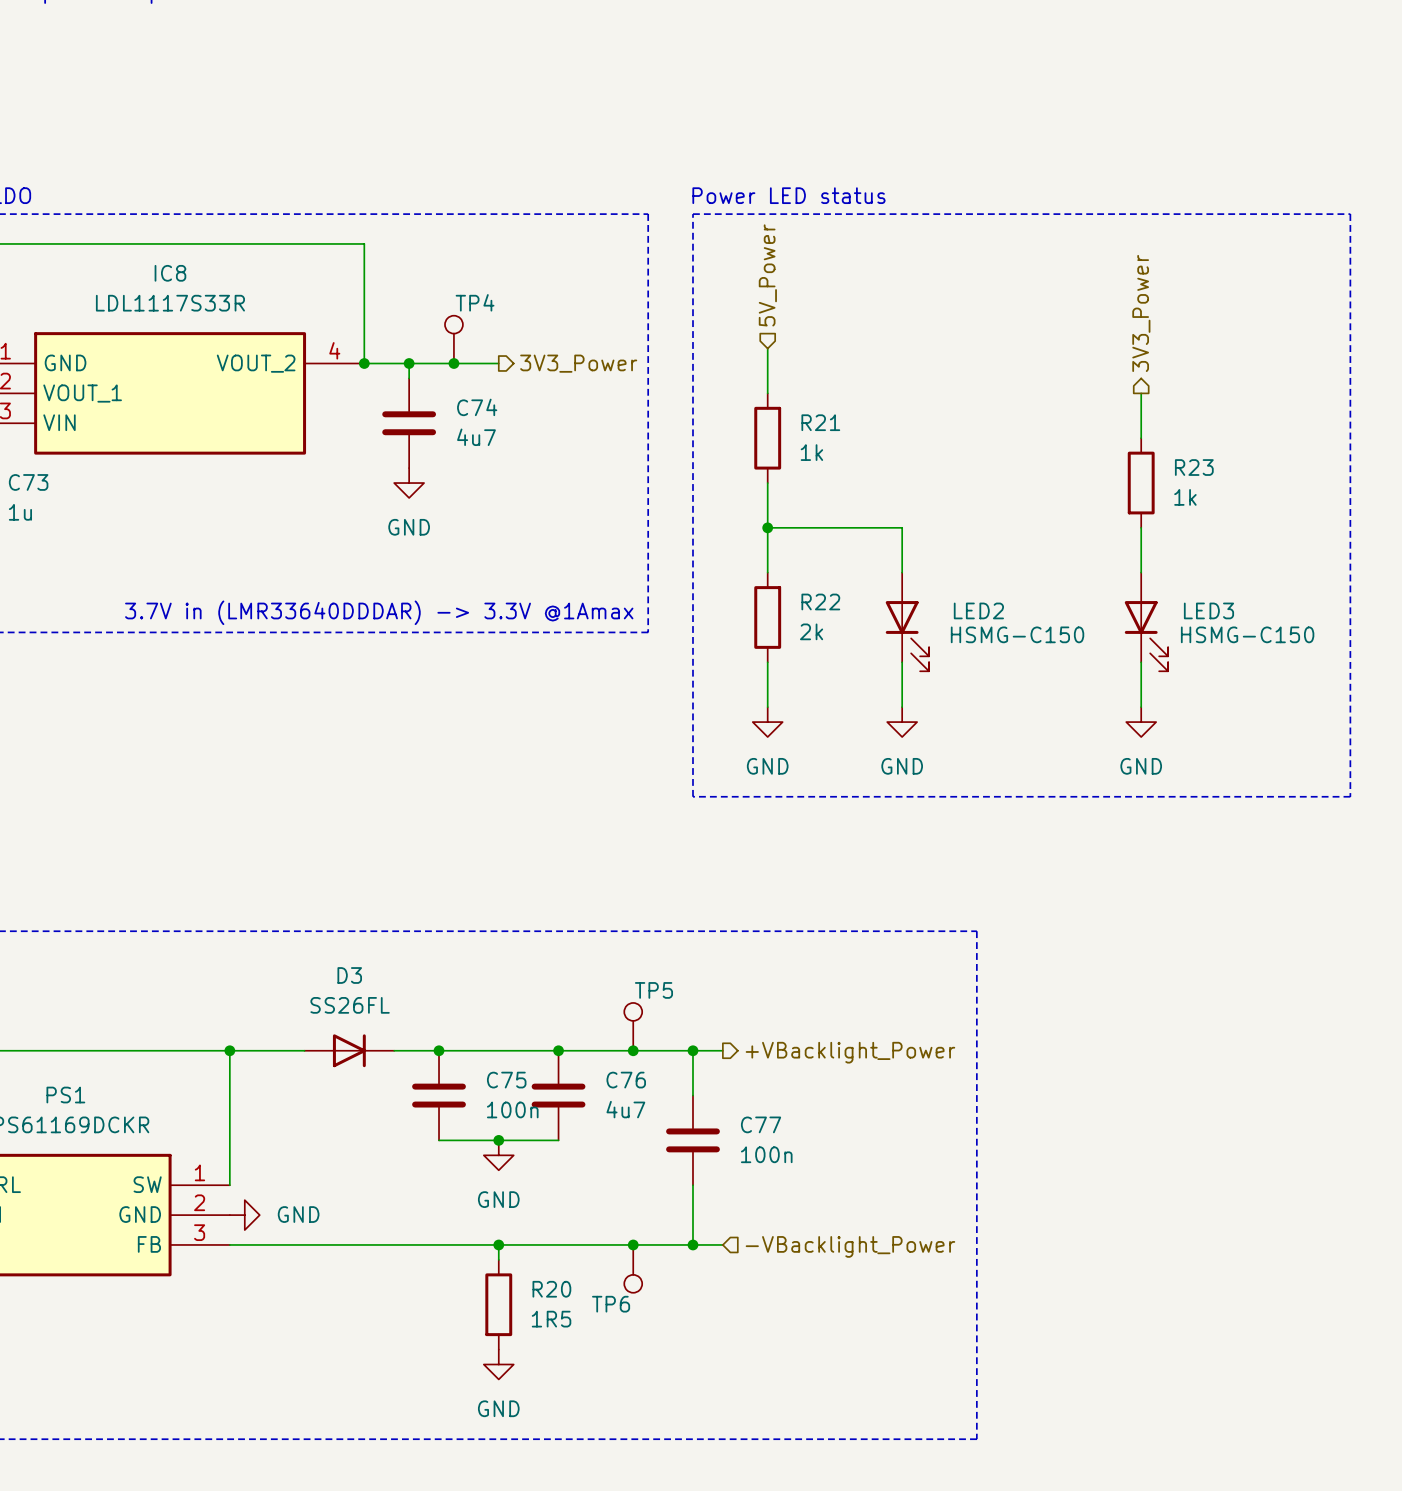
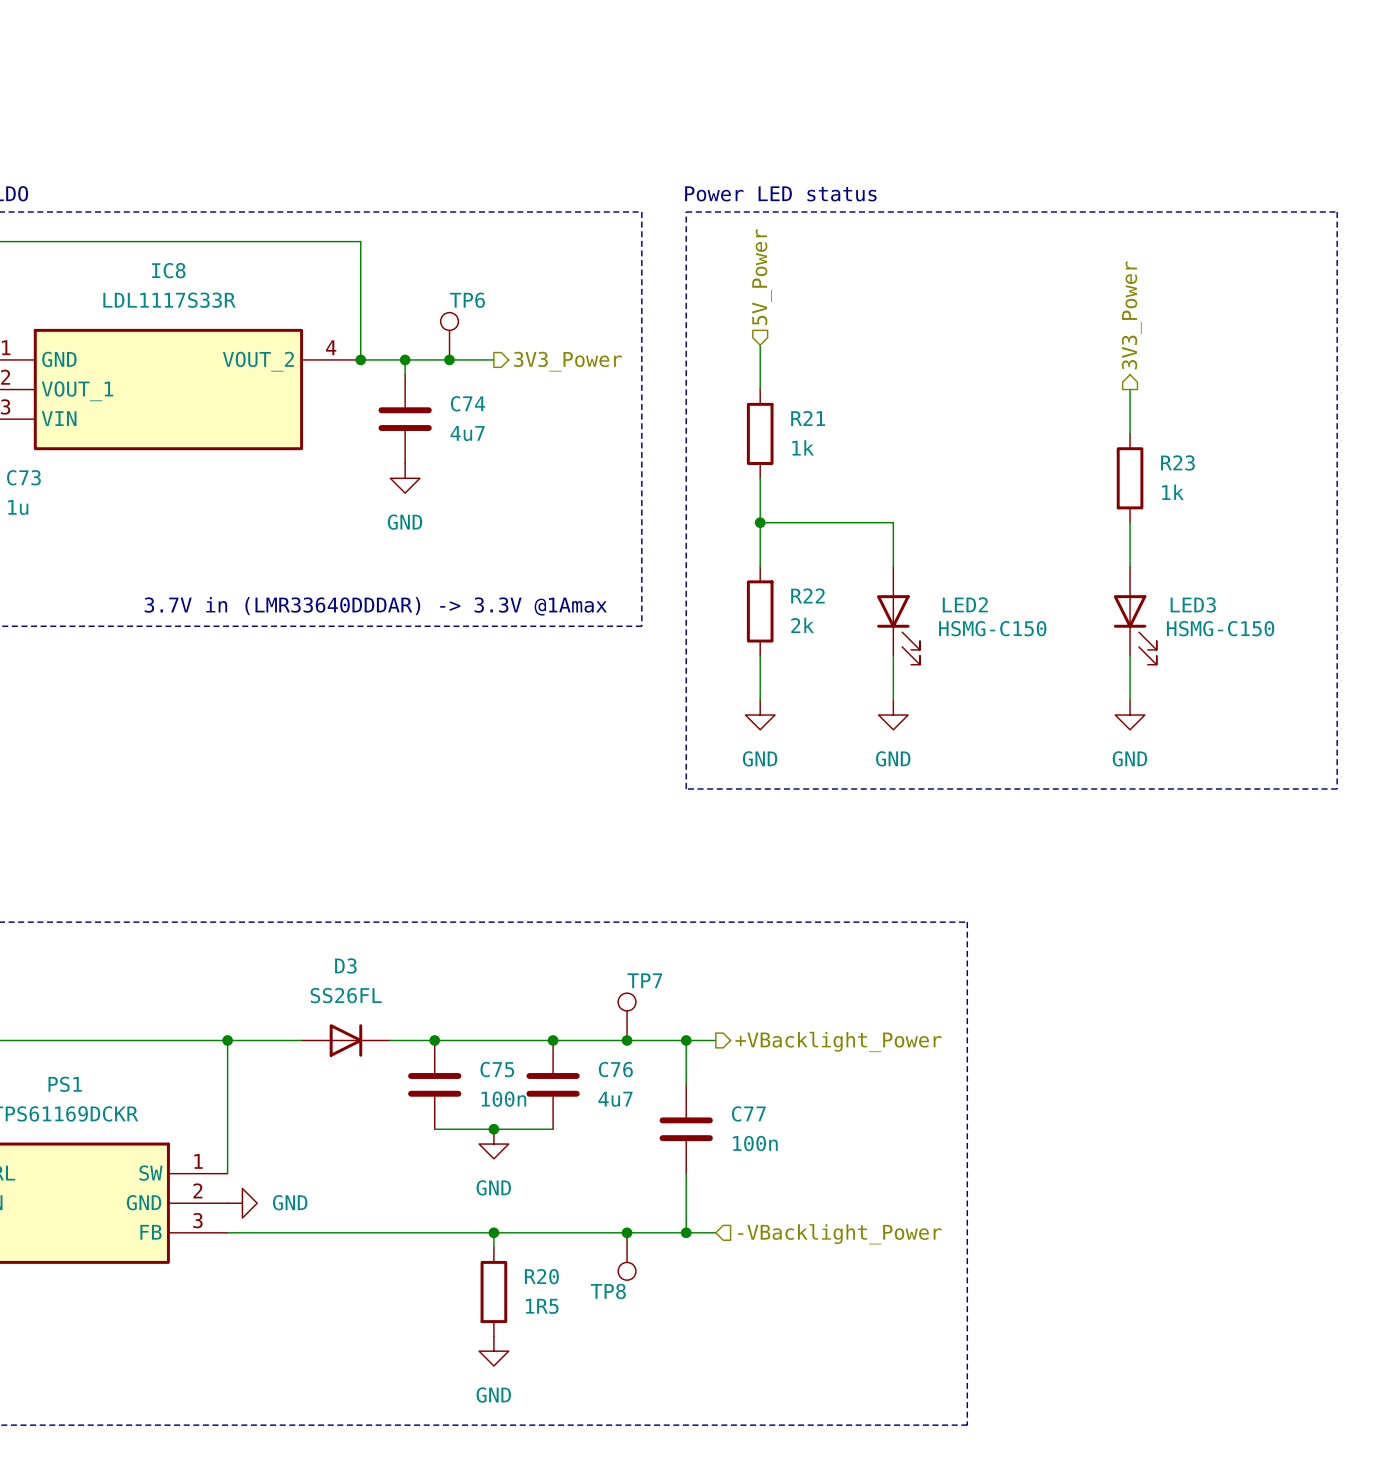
TP4 name: TP4 (475, 302) -> TP6 (467, 300)
TP5 name: TP5 (653, 990) -> TP7 (644, 980)
TP6 name: TP6 (611, 1304) -> TP8 (608, 1291)

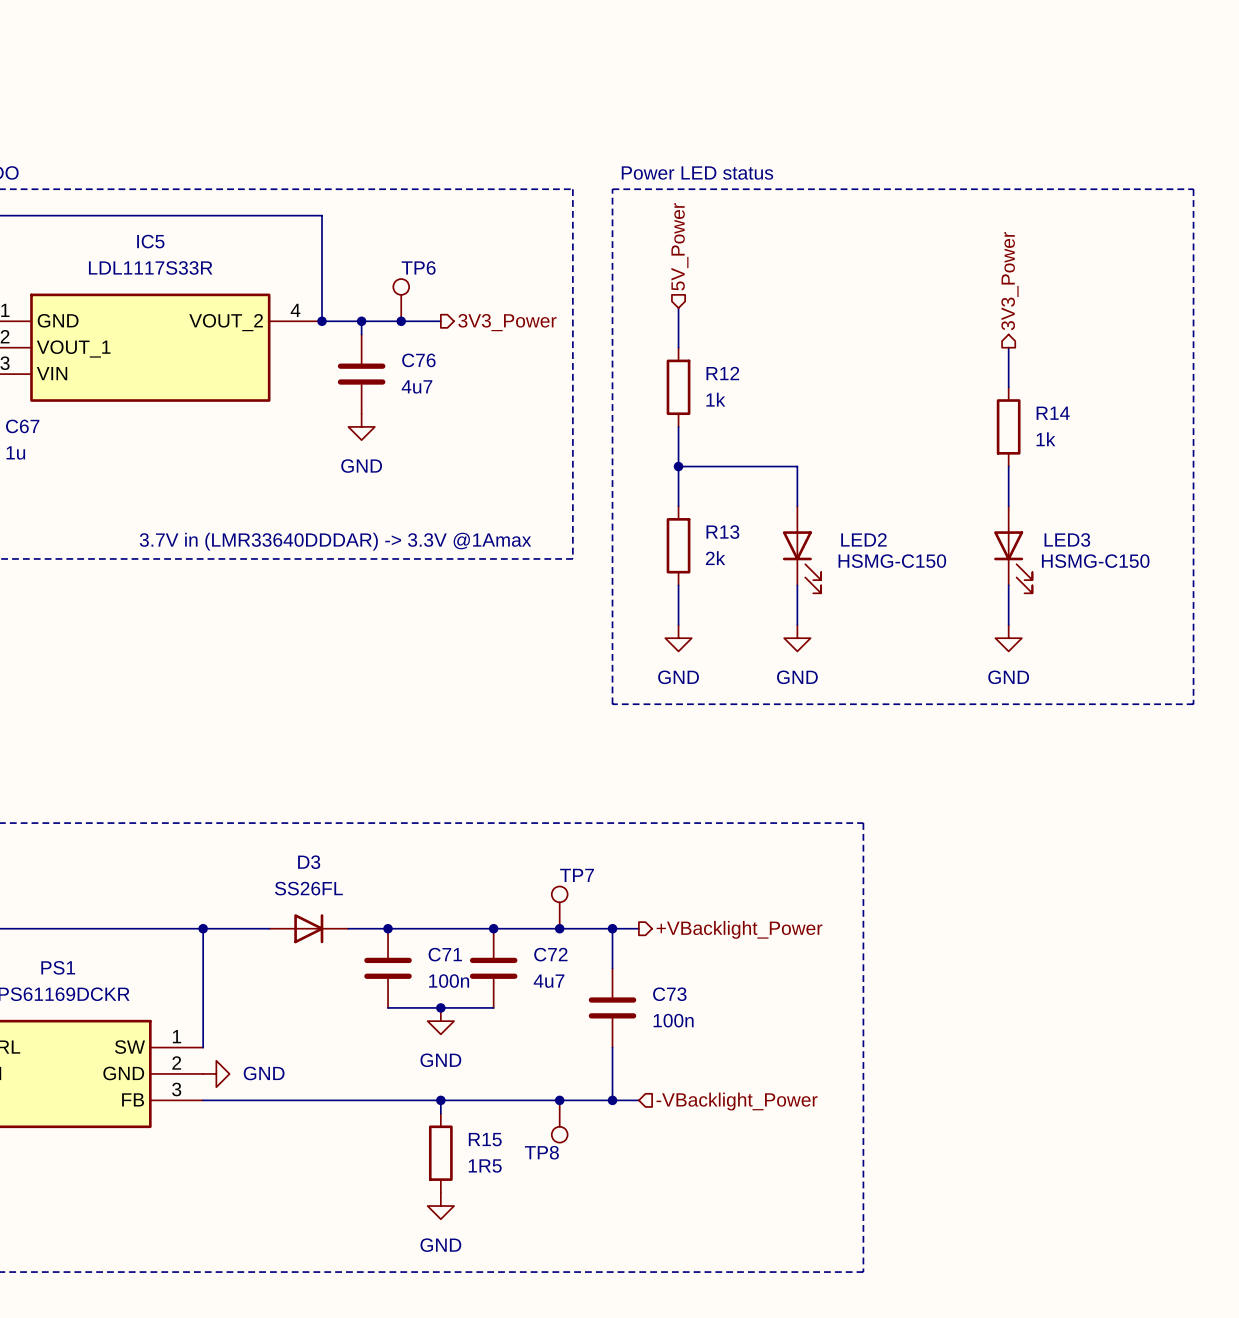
IC8 name: IC8 (168, 270) -> IC5 (150, 241)
C74 name: C74 (468, 403) -> C76 (418, 360)
R21 name: R21 (808, 418) -> R12 (722, 373)
R23 name: R23 (1177, 462) -> R14 (1053, 413)
C73 name: C73 (23, 477) -> C67 (22, 426)
R22 name: R22 (807, 595) -> R13 (722, 532)
C75 name: C75 (497, 1069) -> C71 (445, 954)
C76 name: C76 (615, 1069) -> C72 (550, 954)
C77 name: C77 (748, 1113) -> C73 (669, 994)
R20 name: R20 (541, 1276) -> R15 (485, 1139)

